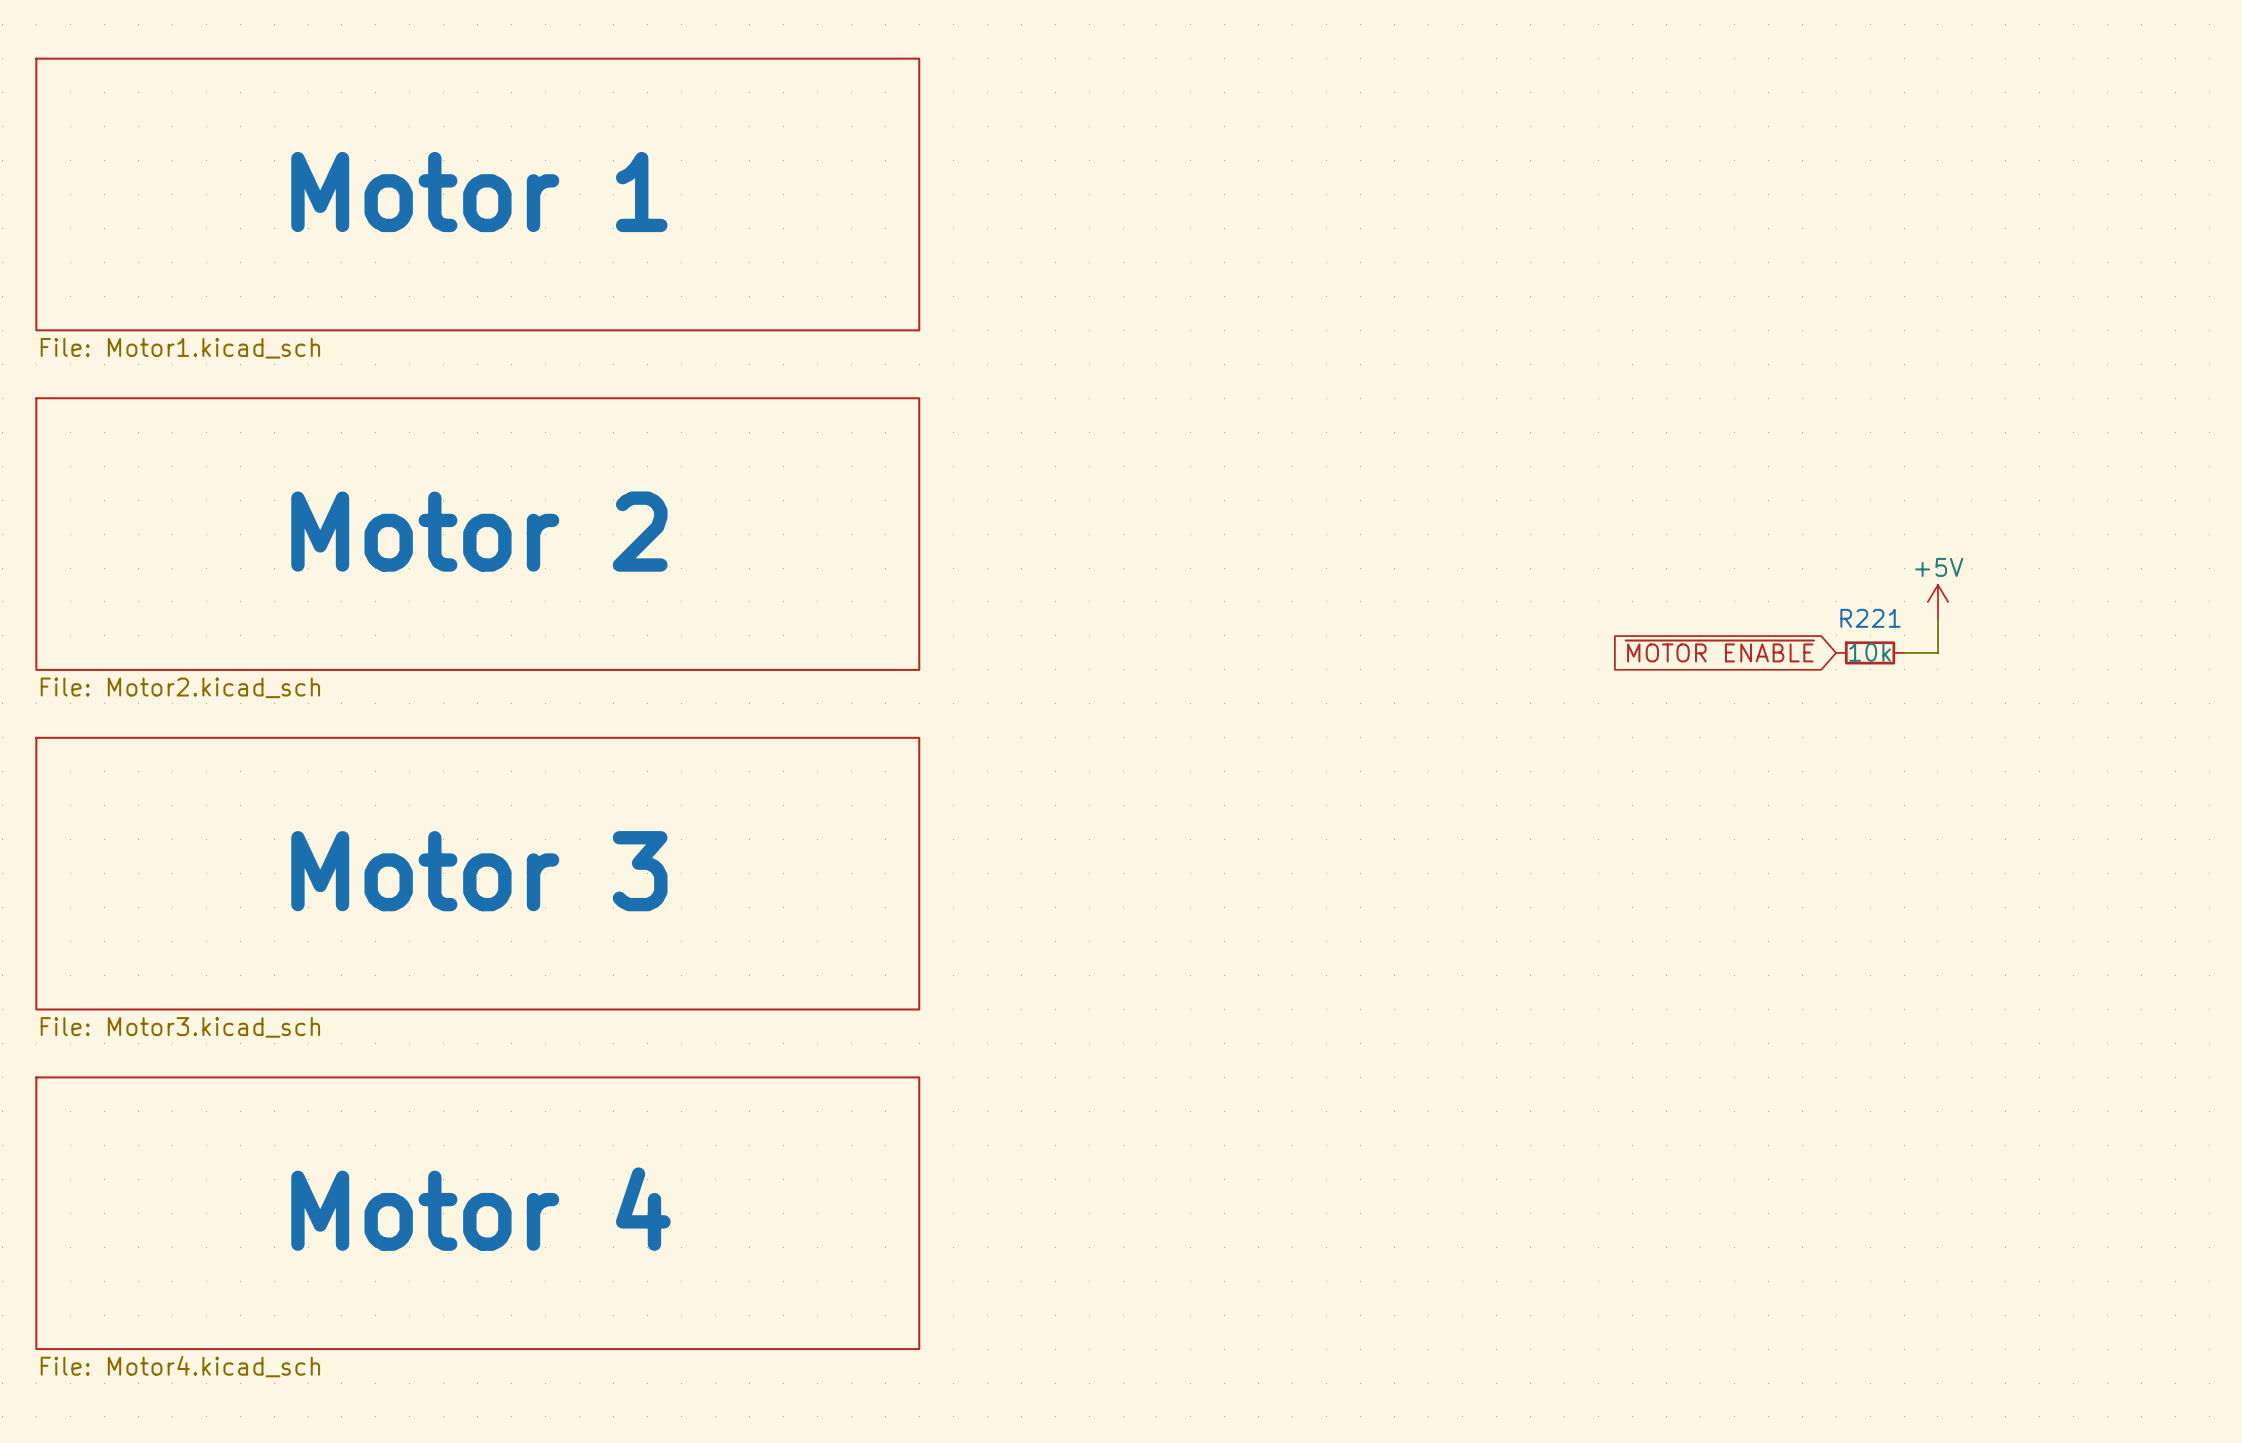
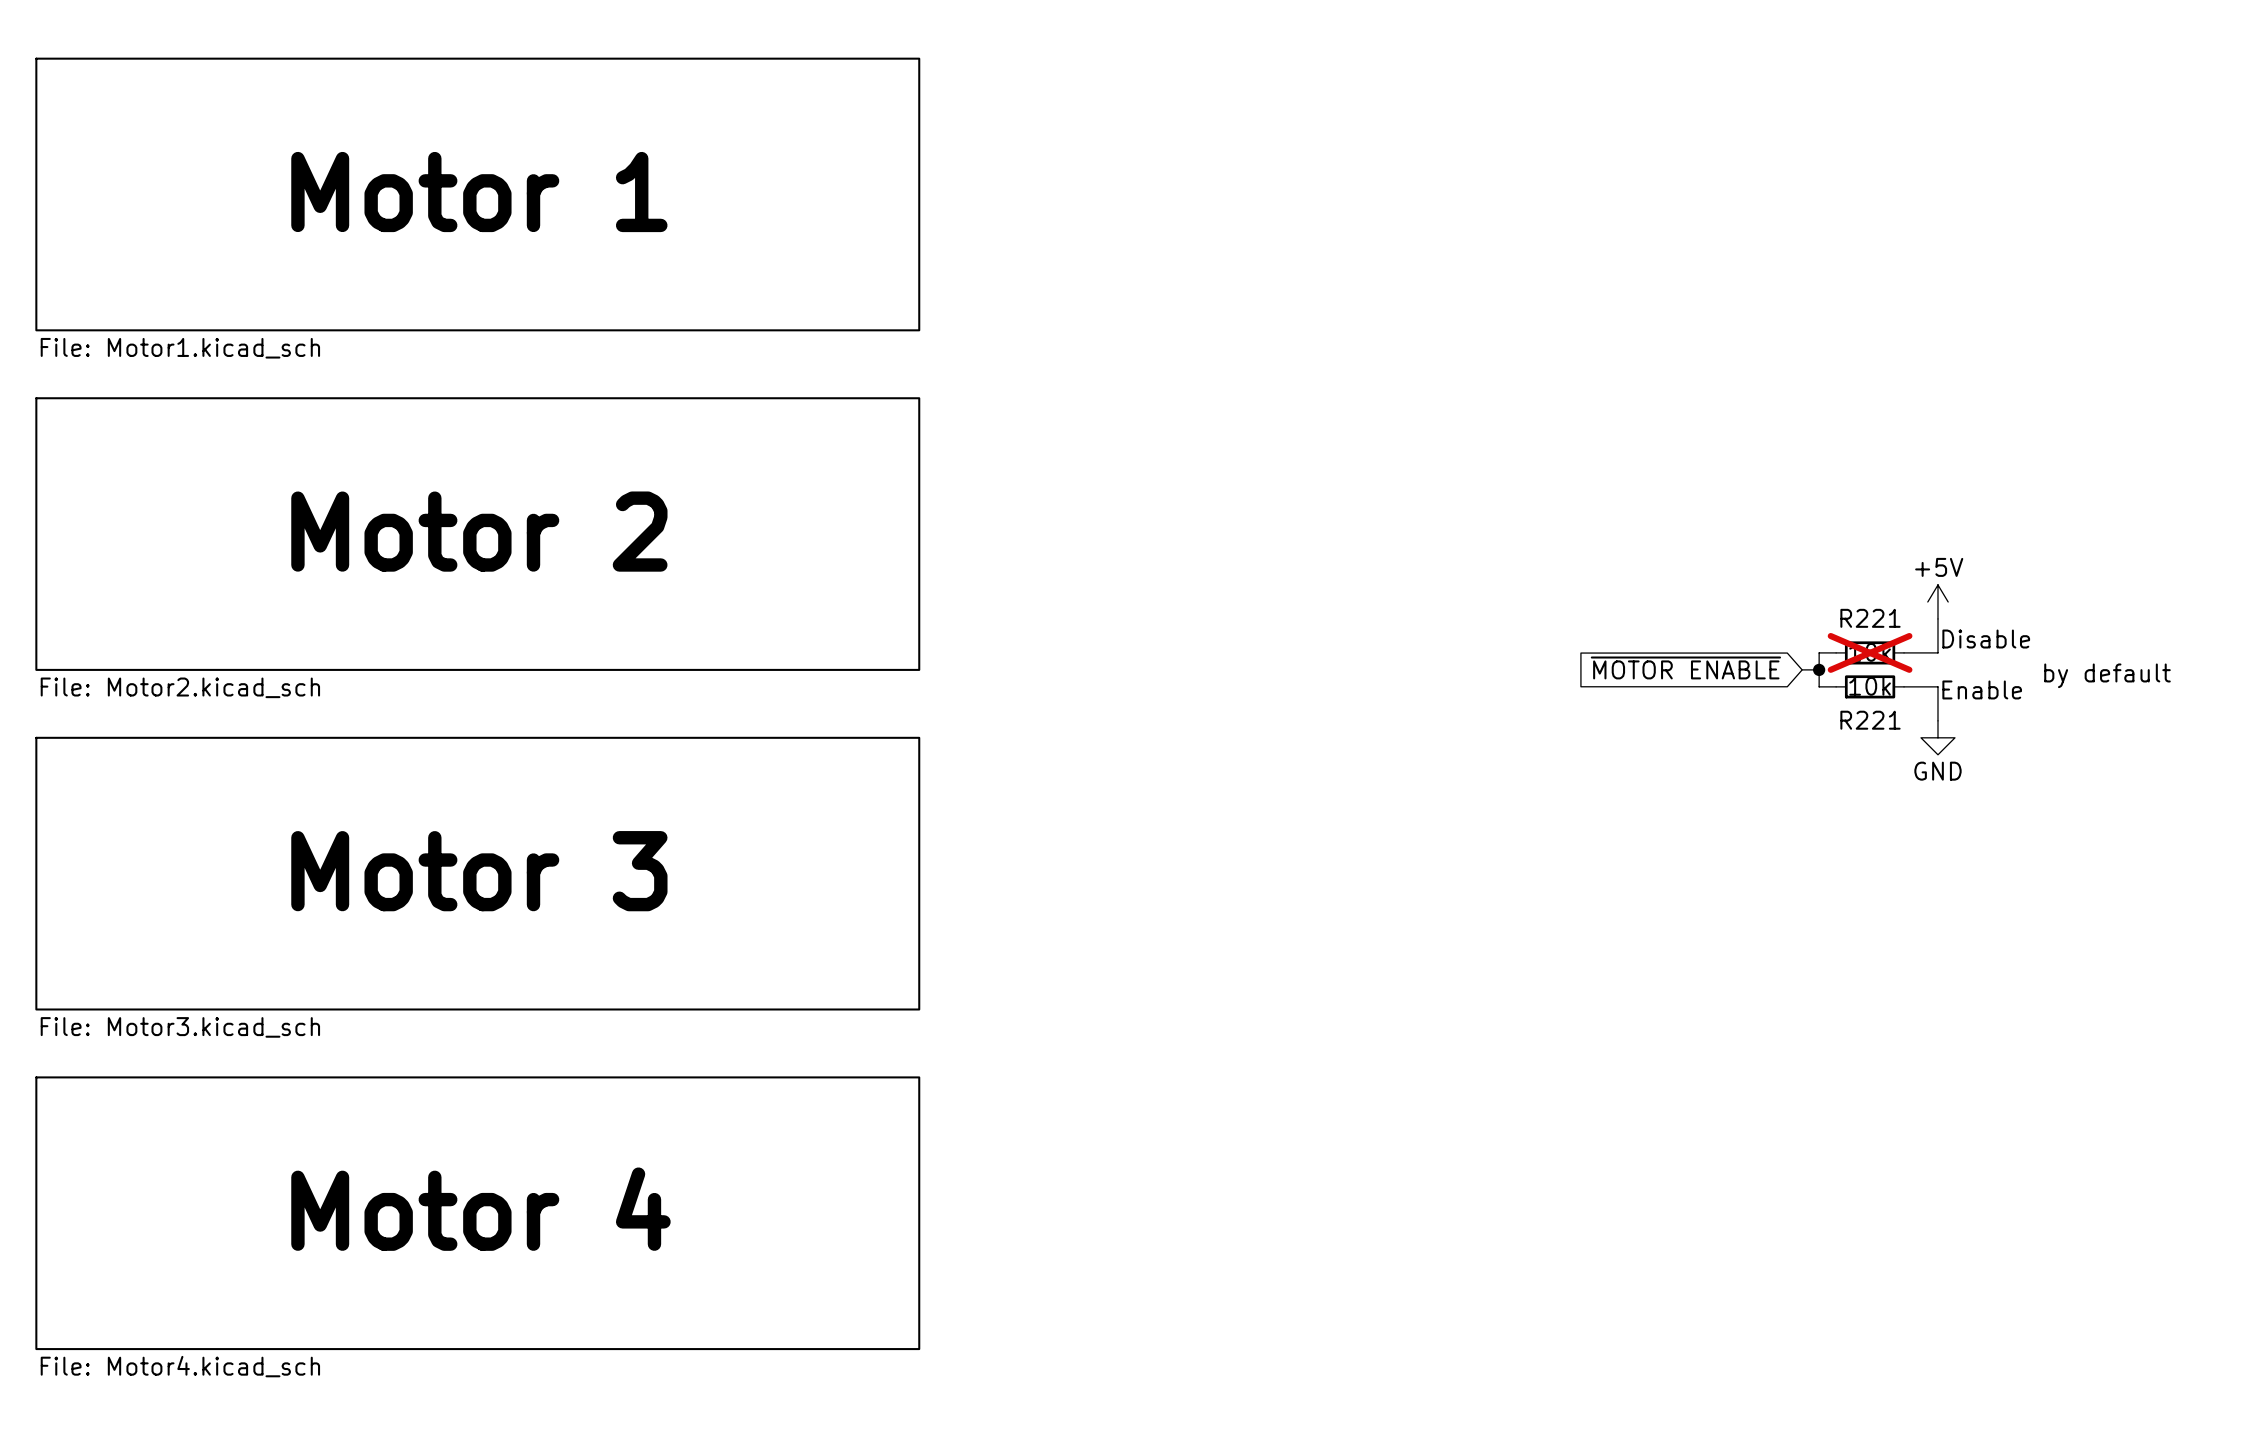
text: none -> Disable (1986, 639)
global label position: ~{MOTOR ENABLE} (1719, 650) -> ~{MOTOR ENABLE} (1685, 667)
wire: none -> (1836, 652) (1819, 652) (1819, 686) (1836, 686)
R221 do-not-place cross: none -> (1870, 652)
junction: none -> (1819, 669)
text: none -> by default (2107, 675)
R221: none -> 10k (1870, 686)
wire: none -> (1904, 686) (1937, 686) (1937, 720)
text: none -> Enable (1982, 689)
power symbol: none -> GND (1937, 737)

